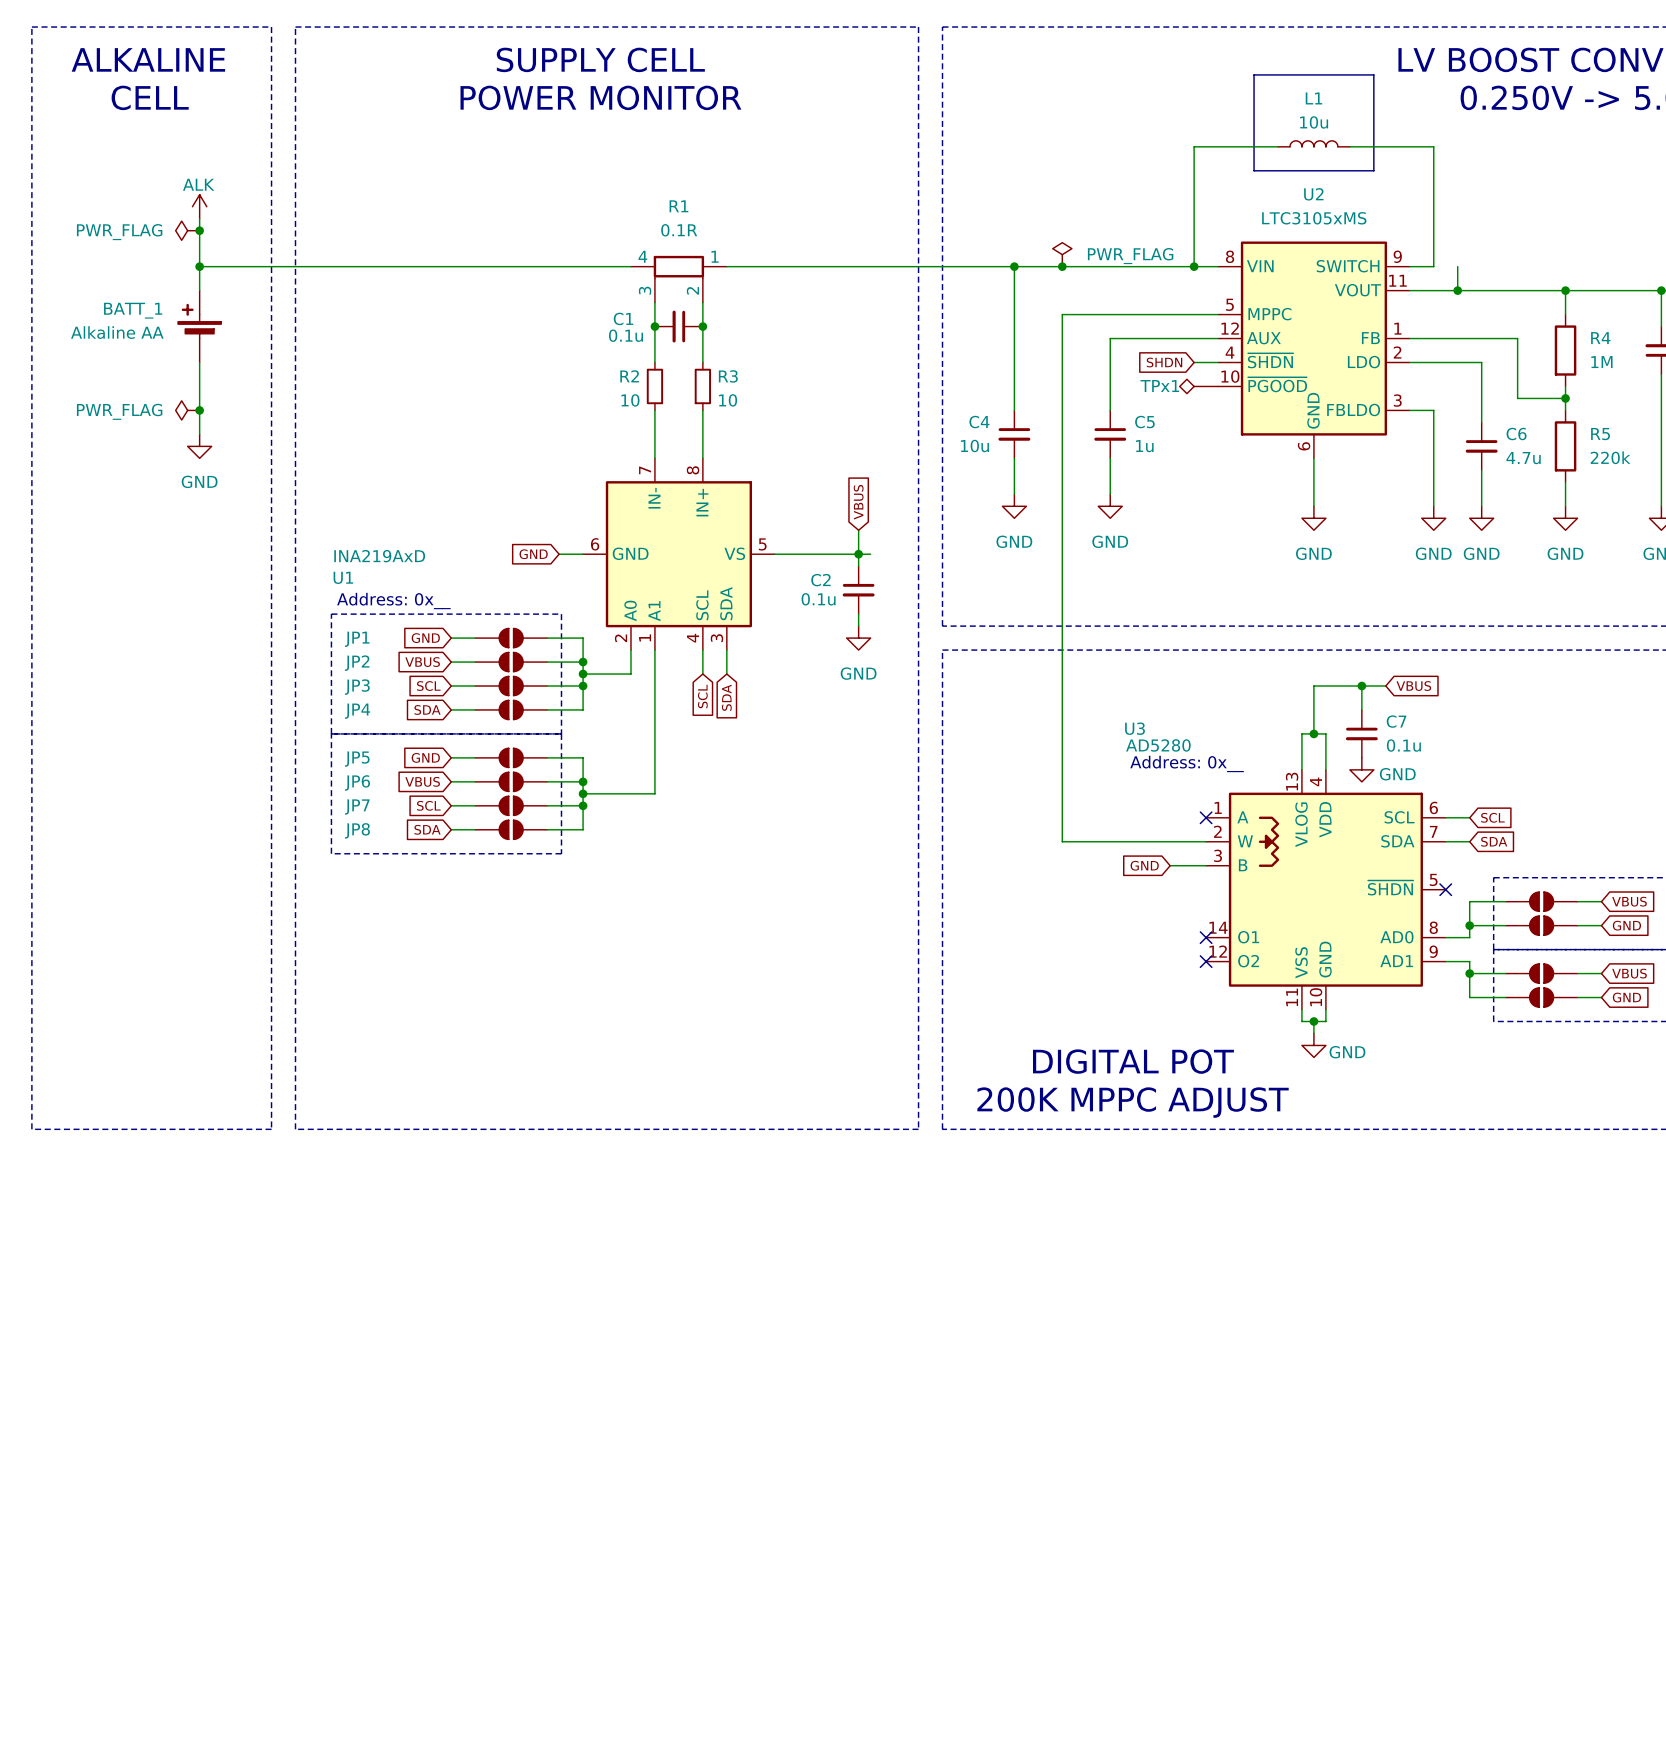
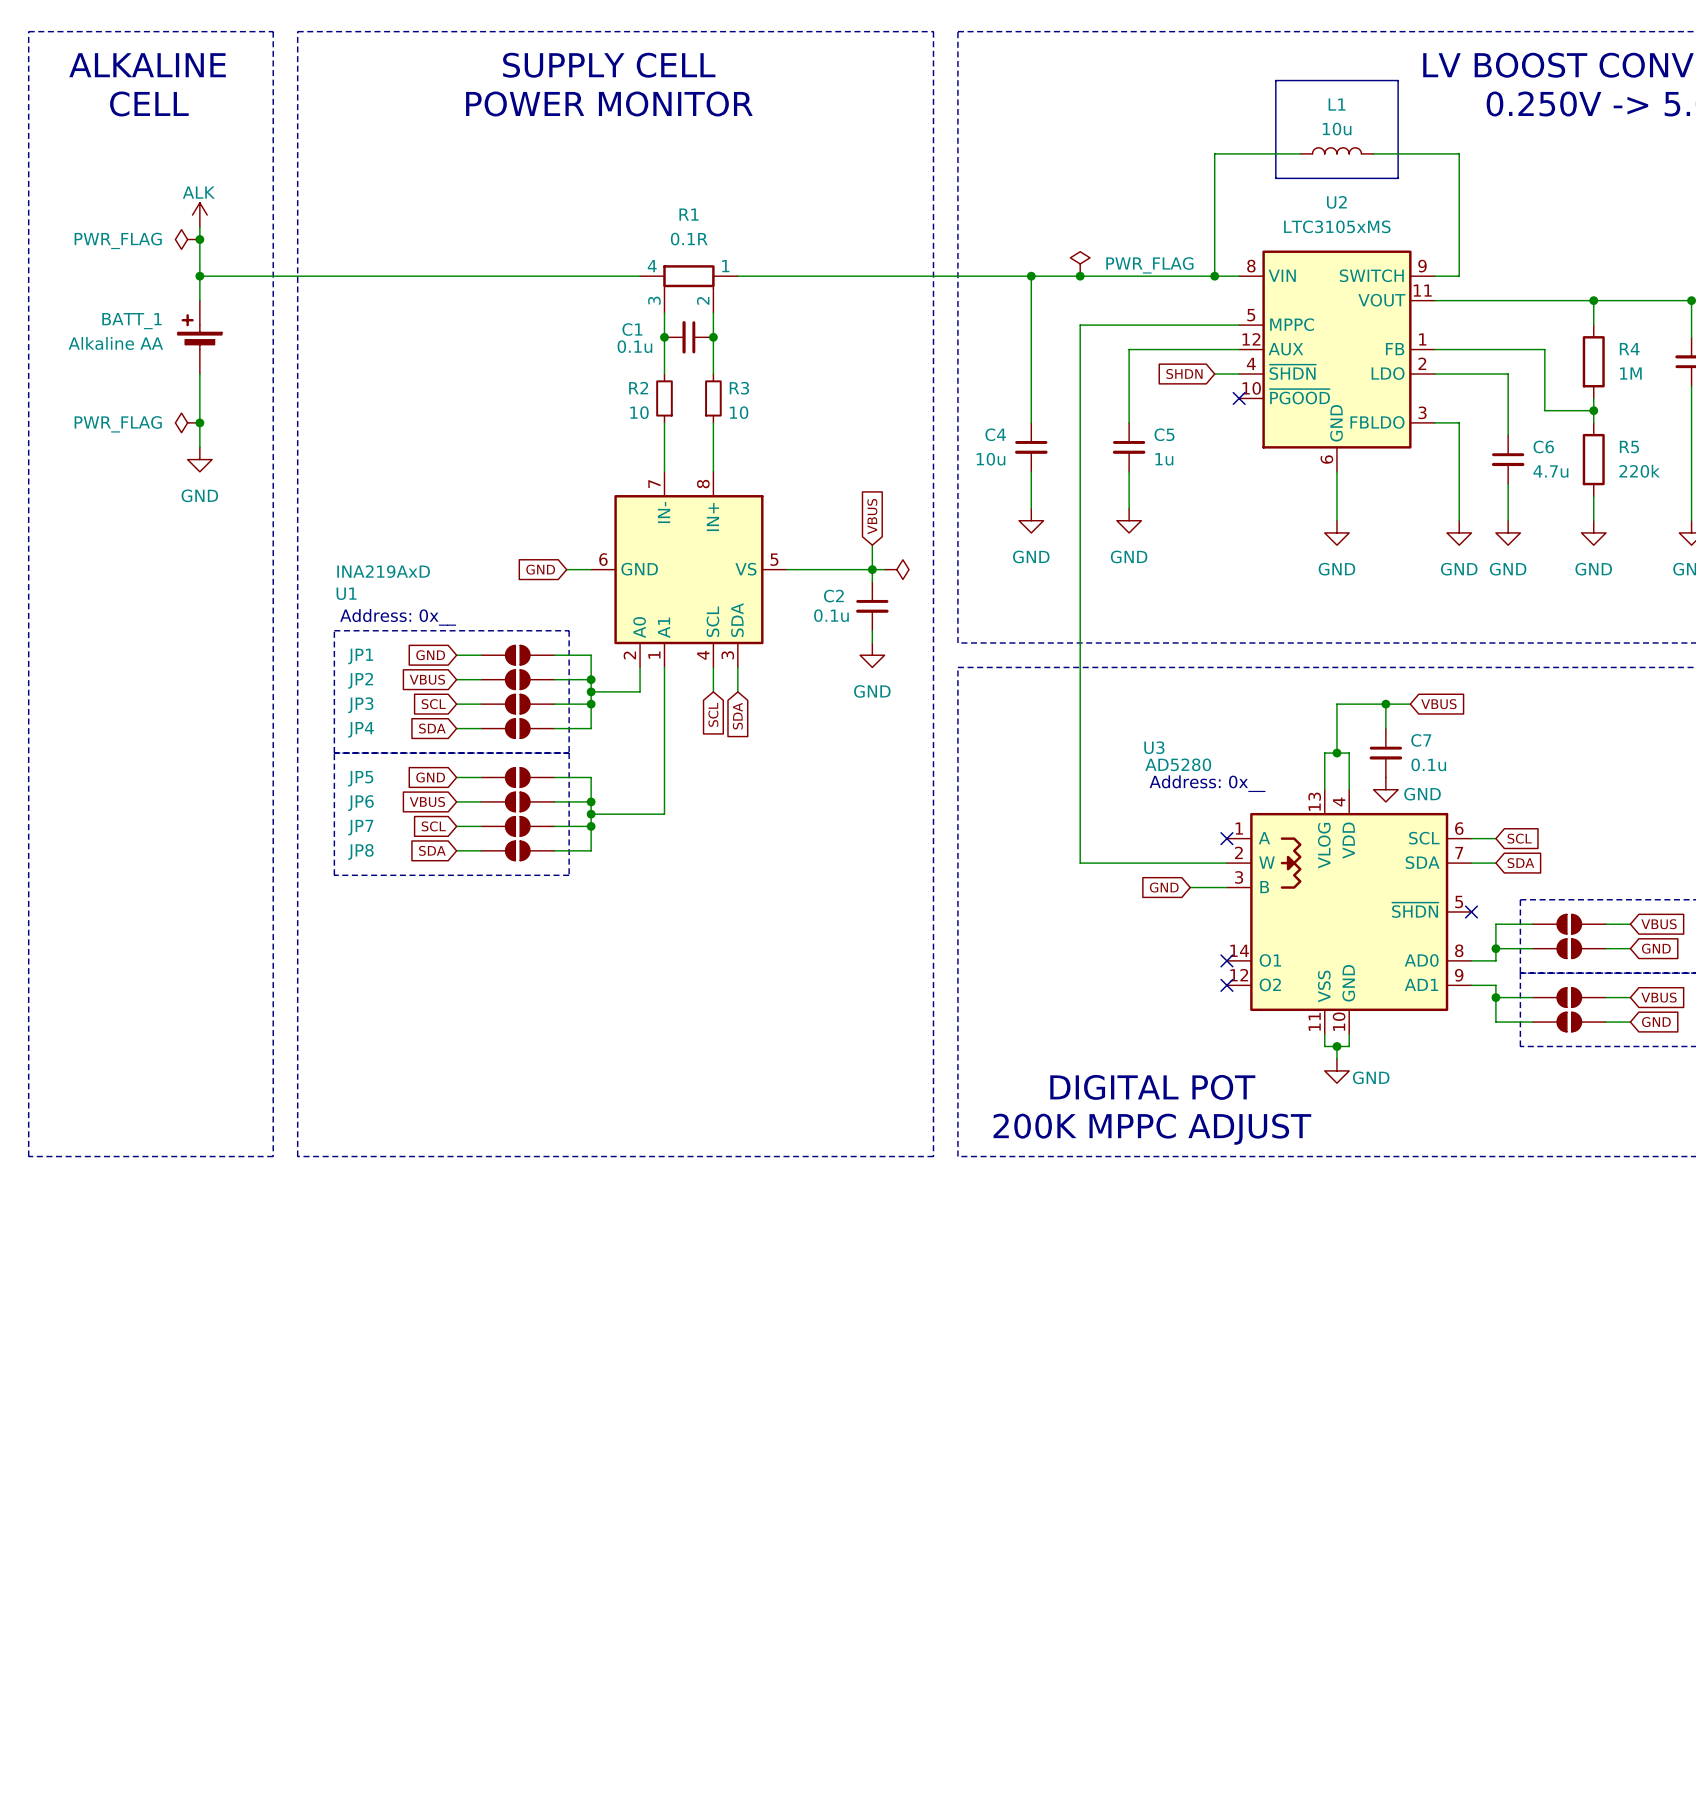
wire: (1457, 266) (1457, 290) -> none
junction: (1457, 290) -> none
TPx1: (1198, 386) -> none
no-connect mark: none -> (1239, 398)
power symbol: none -> (896, 569)

